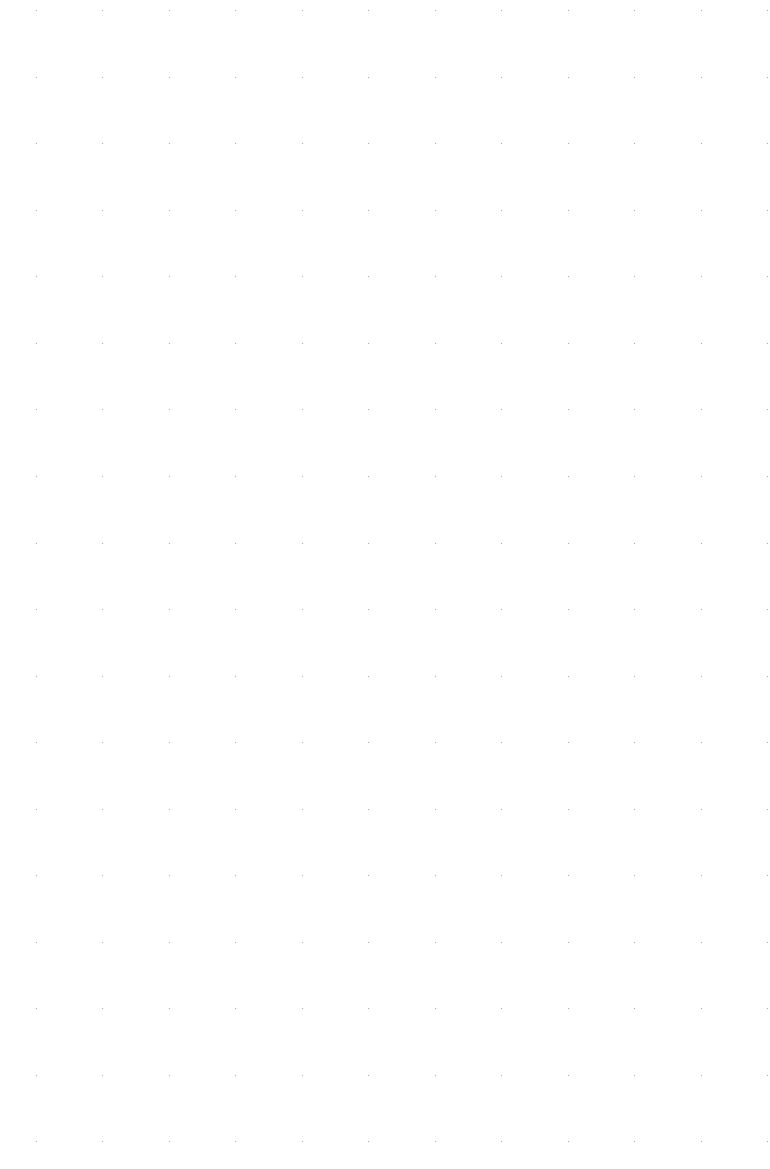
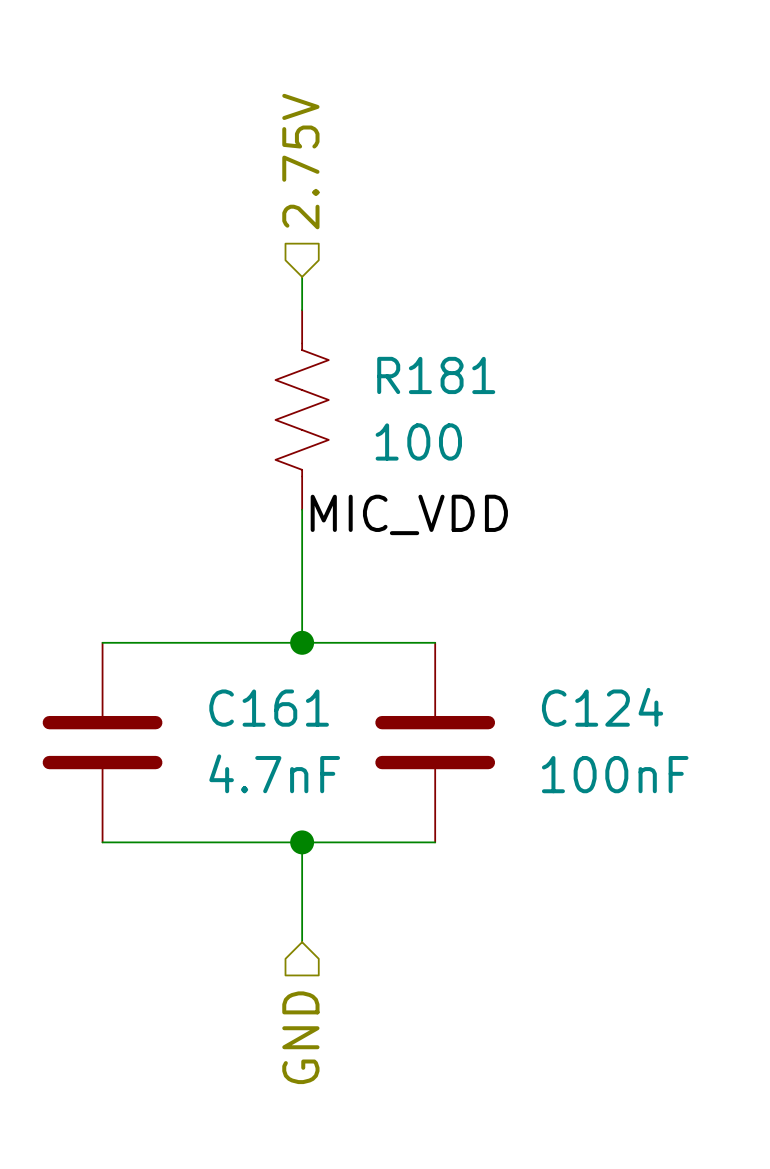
hierarchical label: none -> 2.75V (300, 161)
wire: none -> (302, 276) (302, 310)
R181: none -> 100 (302, 409)
wire: none -> (302, 509) (302, 642)
label: none -> MIC_VDD (409, 514)
wire: none -> (102, 642) (435, 642)
junction: none -> (302, 642)
C161: none -> 4.7nF (102, 742)
C124: none -> 100nF (435, 742)
wire: none -> (102, 842) (435, 842)
wire: none -> (302, 842) (302, 942)
junction: none -> (302, 842)
hierarchical label: none -> GND (300, 1037)

